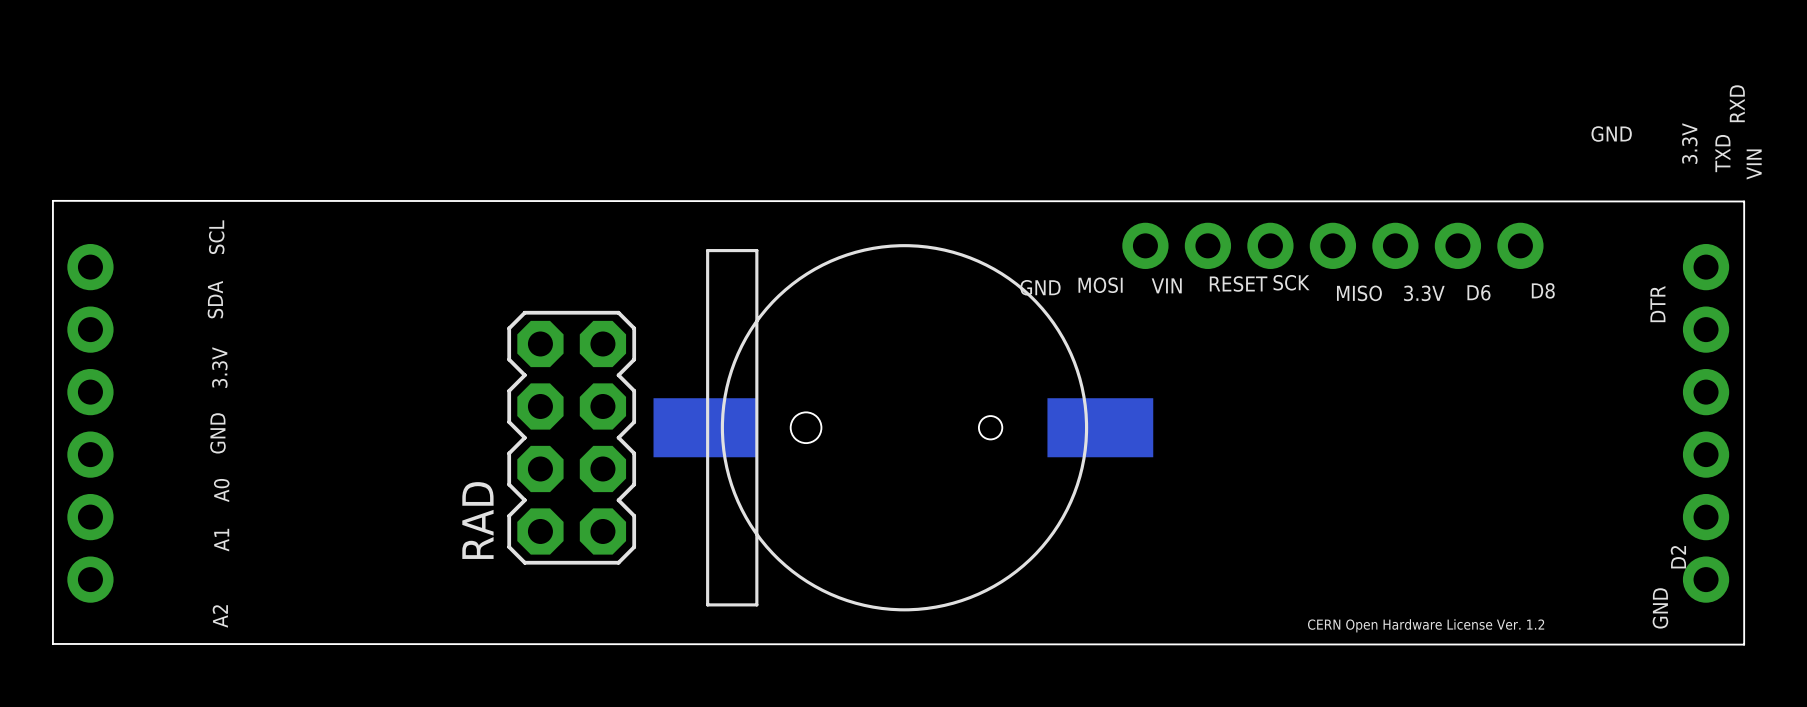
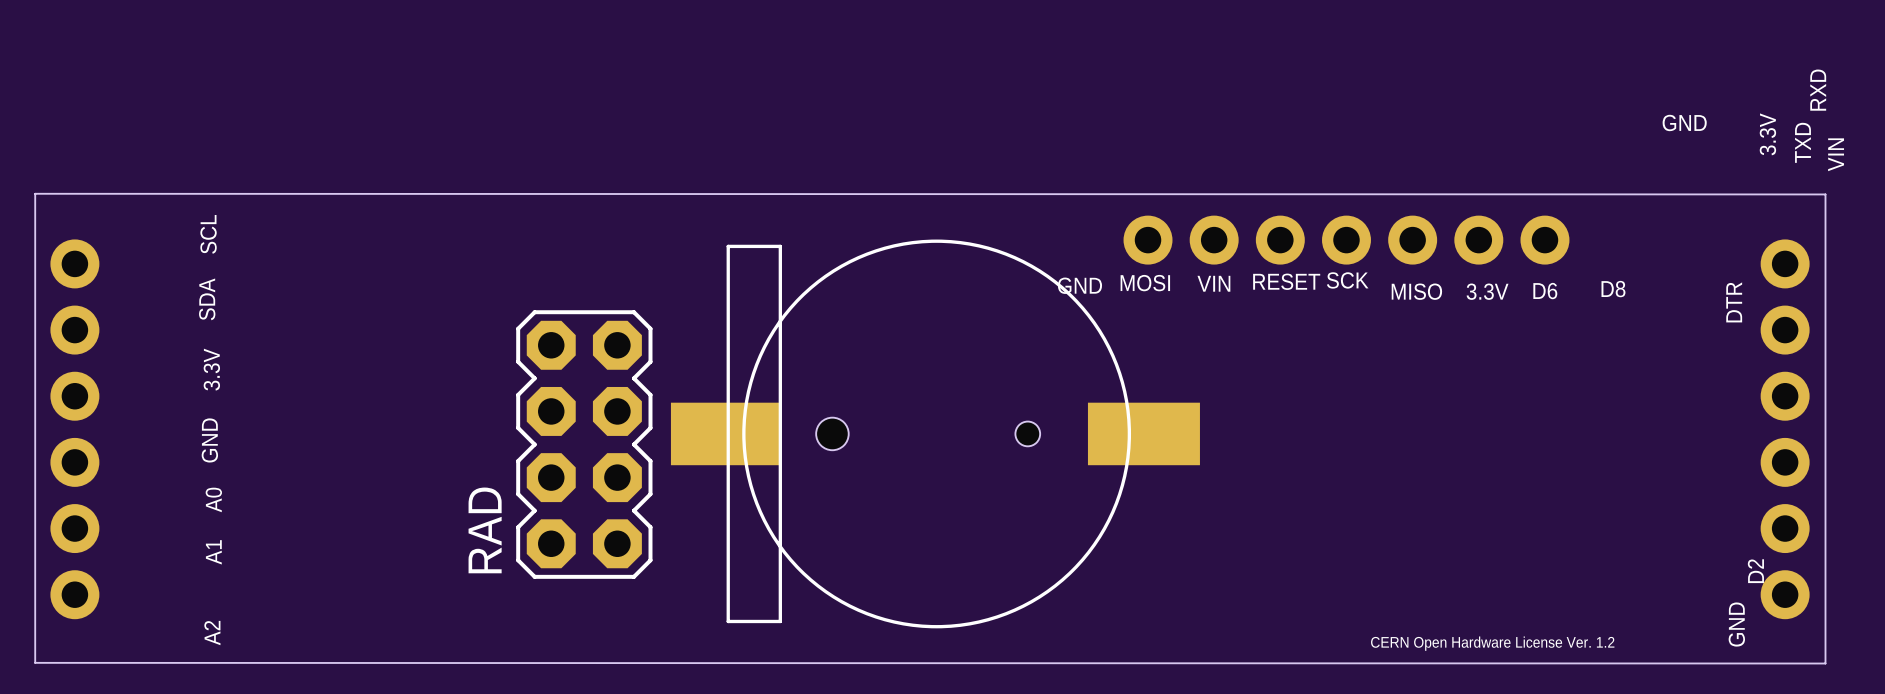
part position: (1332, 245) -> (1346, 240)

